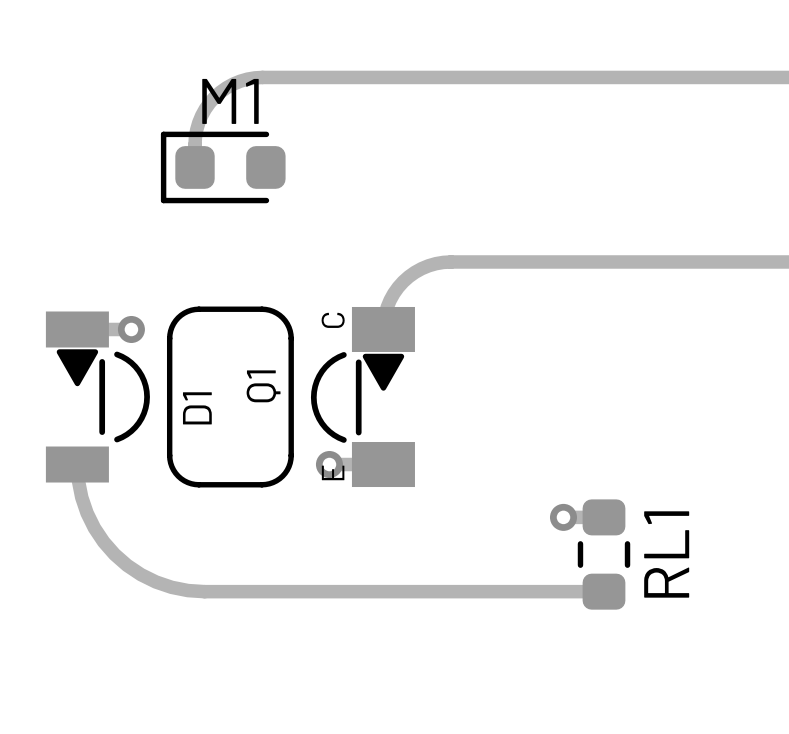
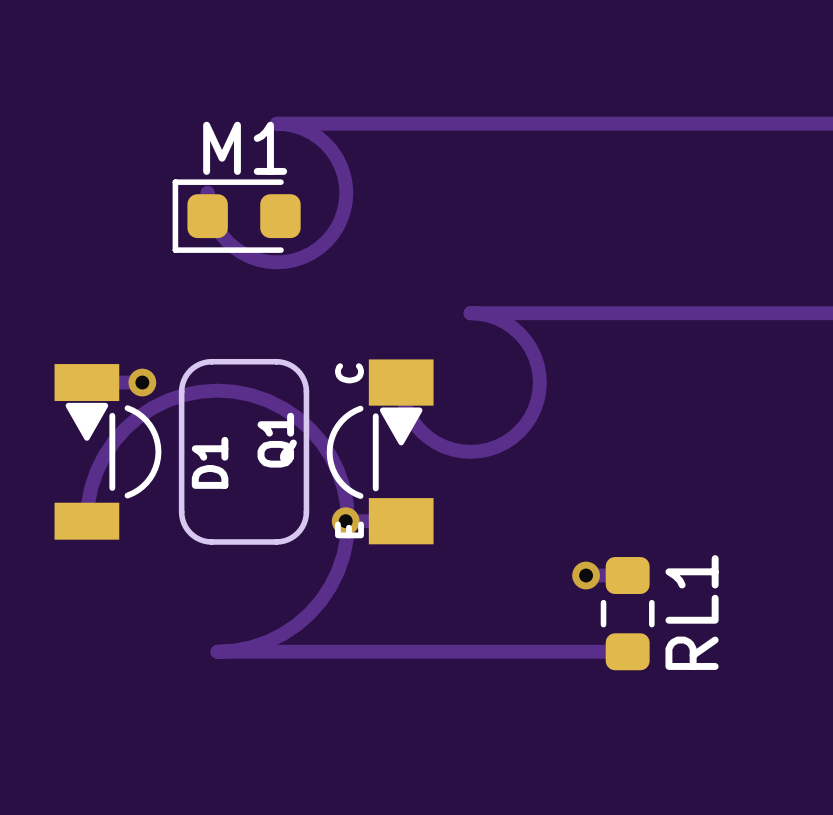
track: (262, 77) (240, 81) (226, 87) (214, 97) (205, 109) (198, 122) (194, 144) -> (276, 123) (294, 126) (319, 138) (331, 150) (341, 166) (346, 193) (343, 210) (337, 227) (326, 242) (311, 253) (294, 260) (267, 261) (250, 257) (234, 248) (221, 235) (210, 210) (207, 193)
track: (450, 261) (435, 263) (421, 268) (403, 281) (390, 300) (385, 314) (383, 329) -> (470, 313) (488, 315) (505, 322) (525, 340) (534, 356) (539, 373) (537, 400) (530, 417) (519, 431) (505, 442) (488, 449) (461, 451) (443, 446) (428, 437) (410, 417) (403, 400) (401, 382)
track: (77, 464) (78, 481) (87, 513) (94, 528) (114, 554) (127, 565) (155, 581) (171, 587) (204, 591) -> (86, 521) (91, 487) (104, 455) (125, 428) (137, 417) (167, 400) (200, 391) (217, 390) (251, 395) (282, 408) (309, 428) (330, 455) (343, 487) (348, 521) (343, 554) (338, 571) (321, 600) (296, 624) (267, 641) (234, 650) (217, 651)

